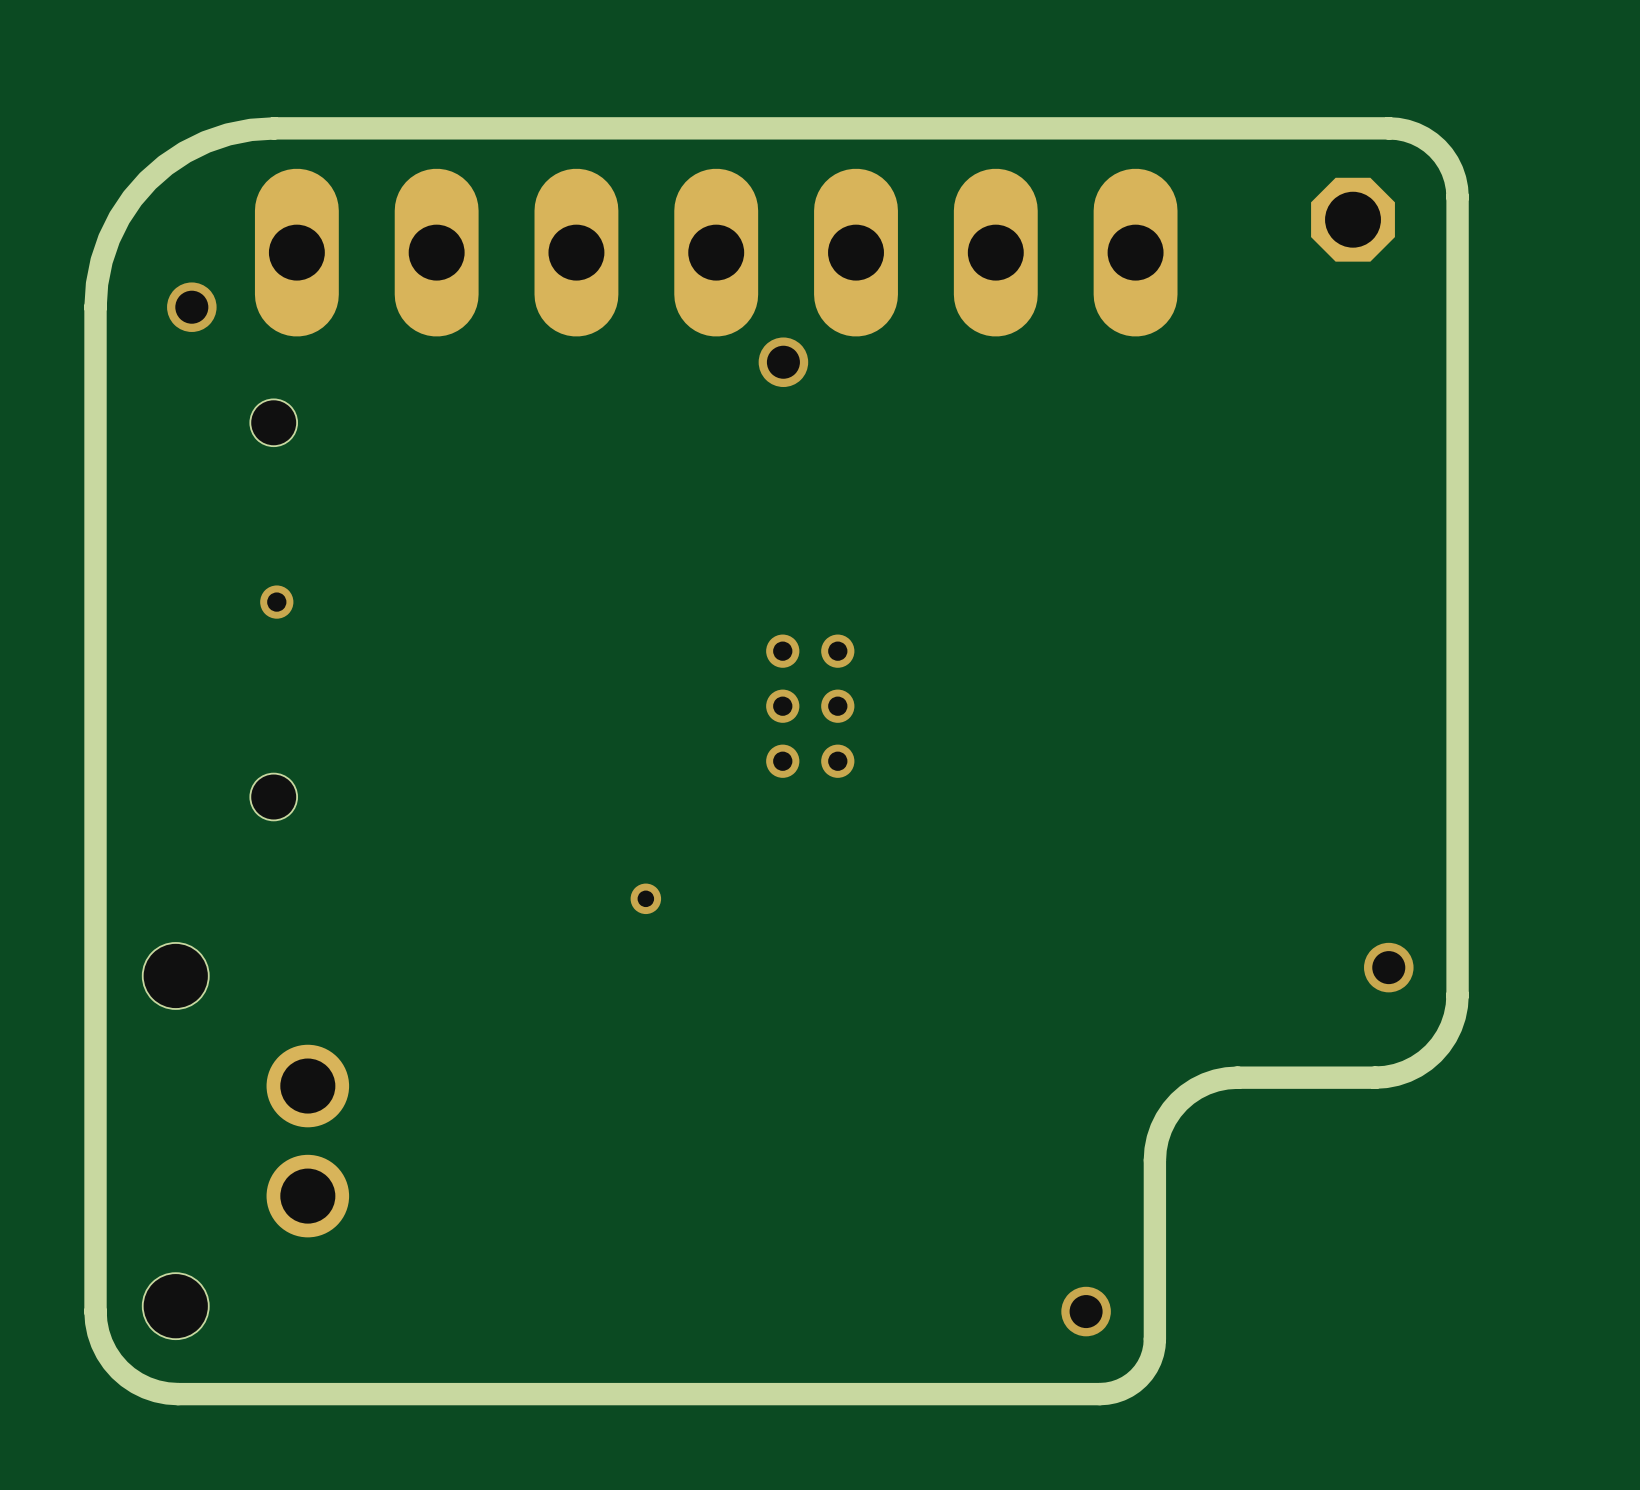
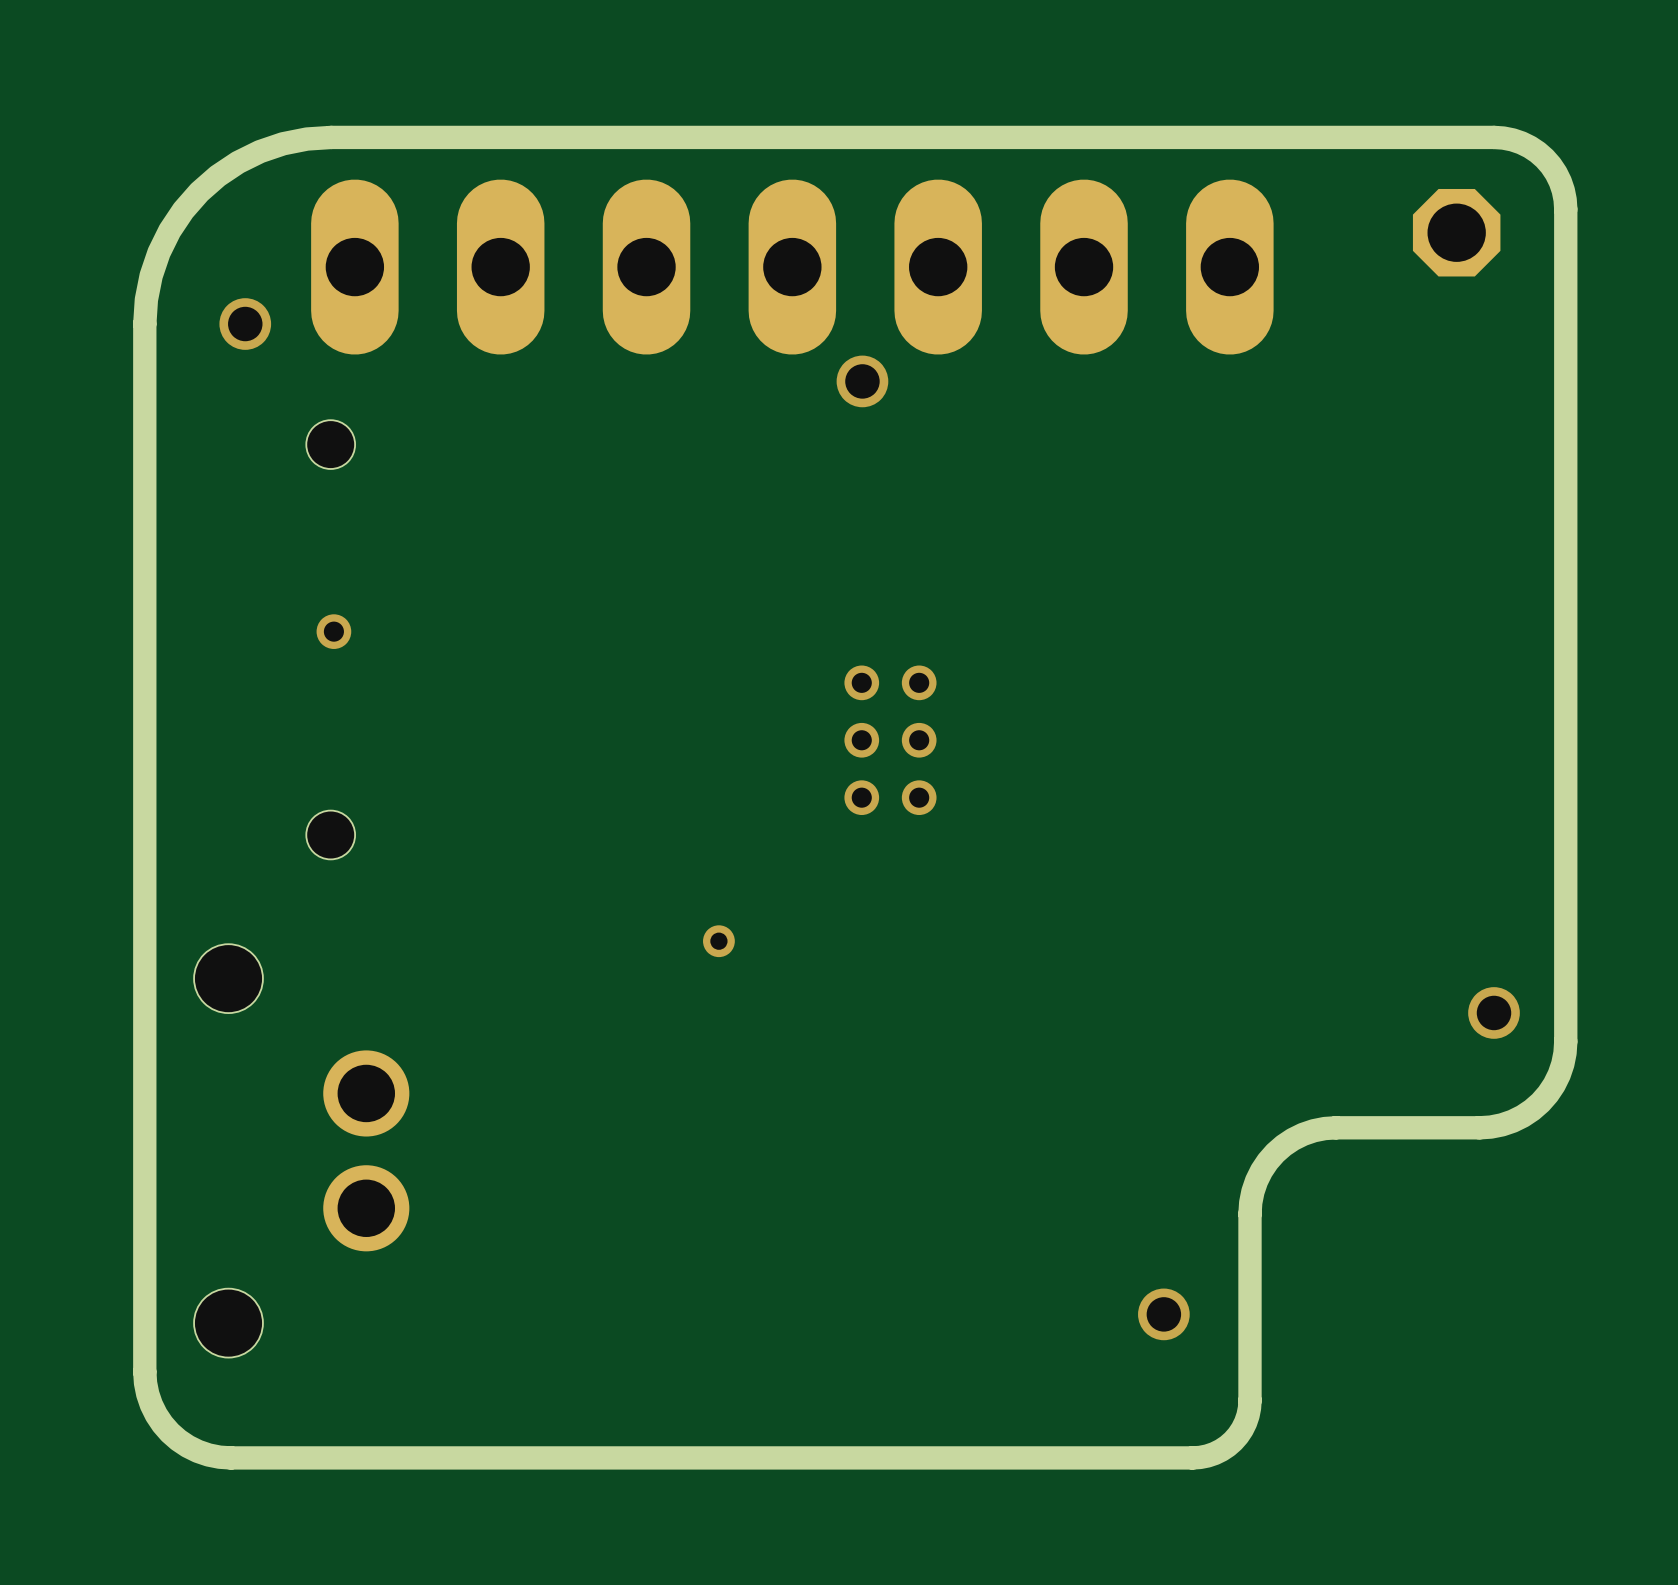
part position: (245, 1141) -> (301, 1150)
via position: (1086, 1311) -> (1163, 1314)

